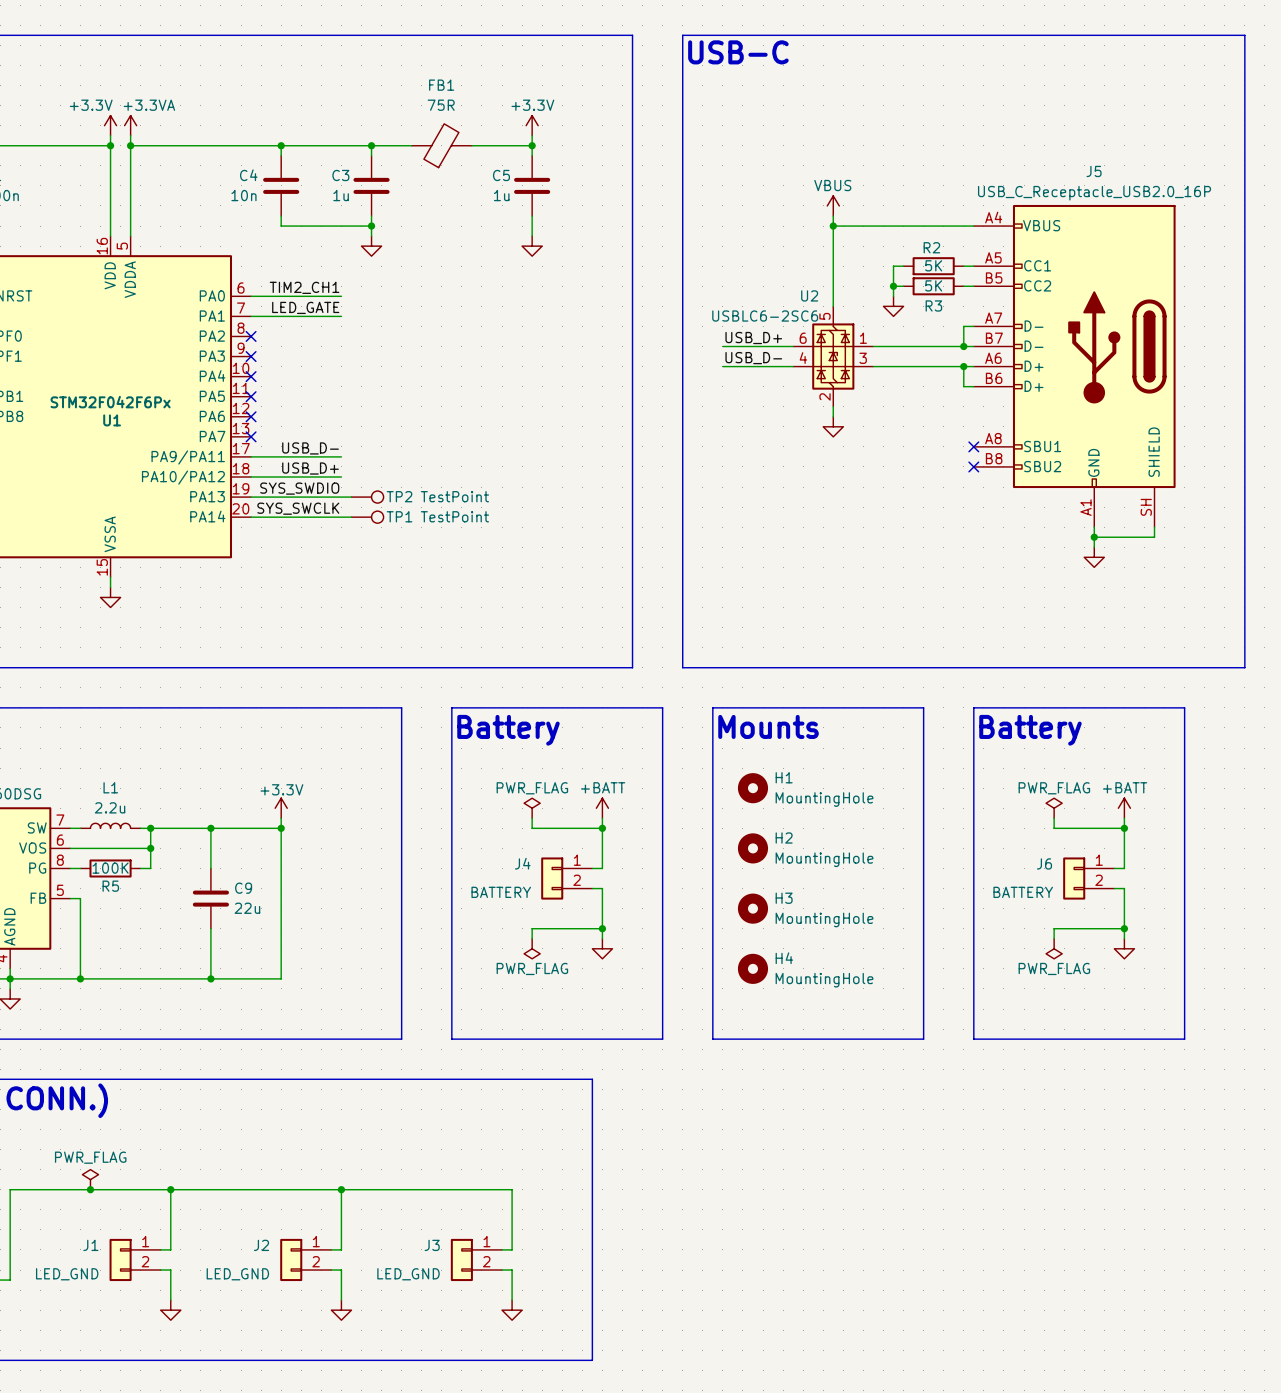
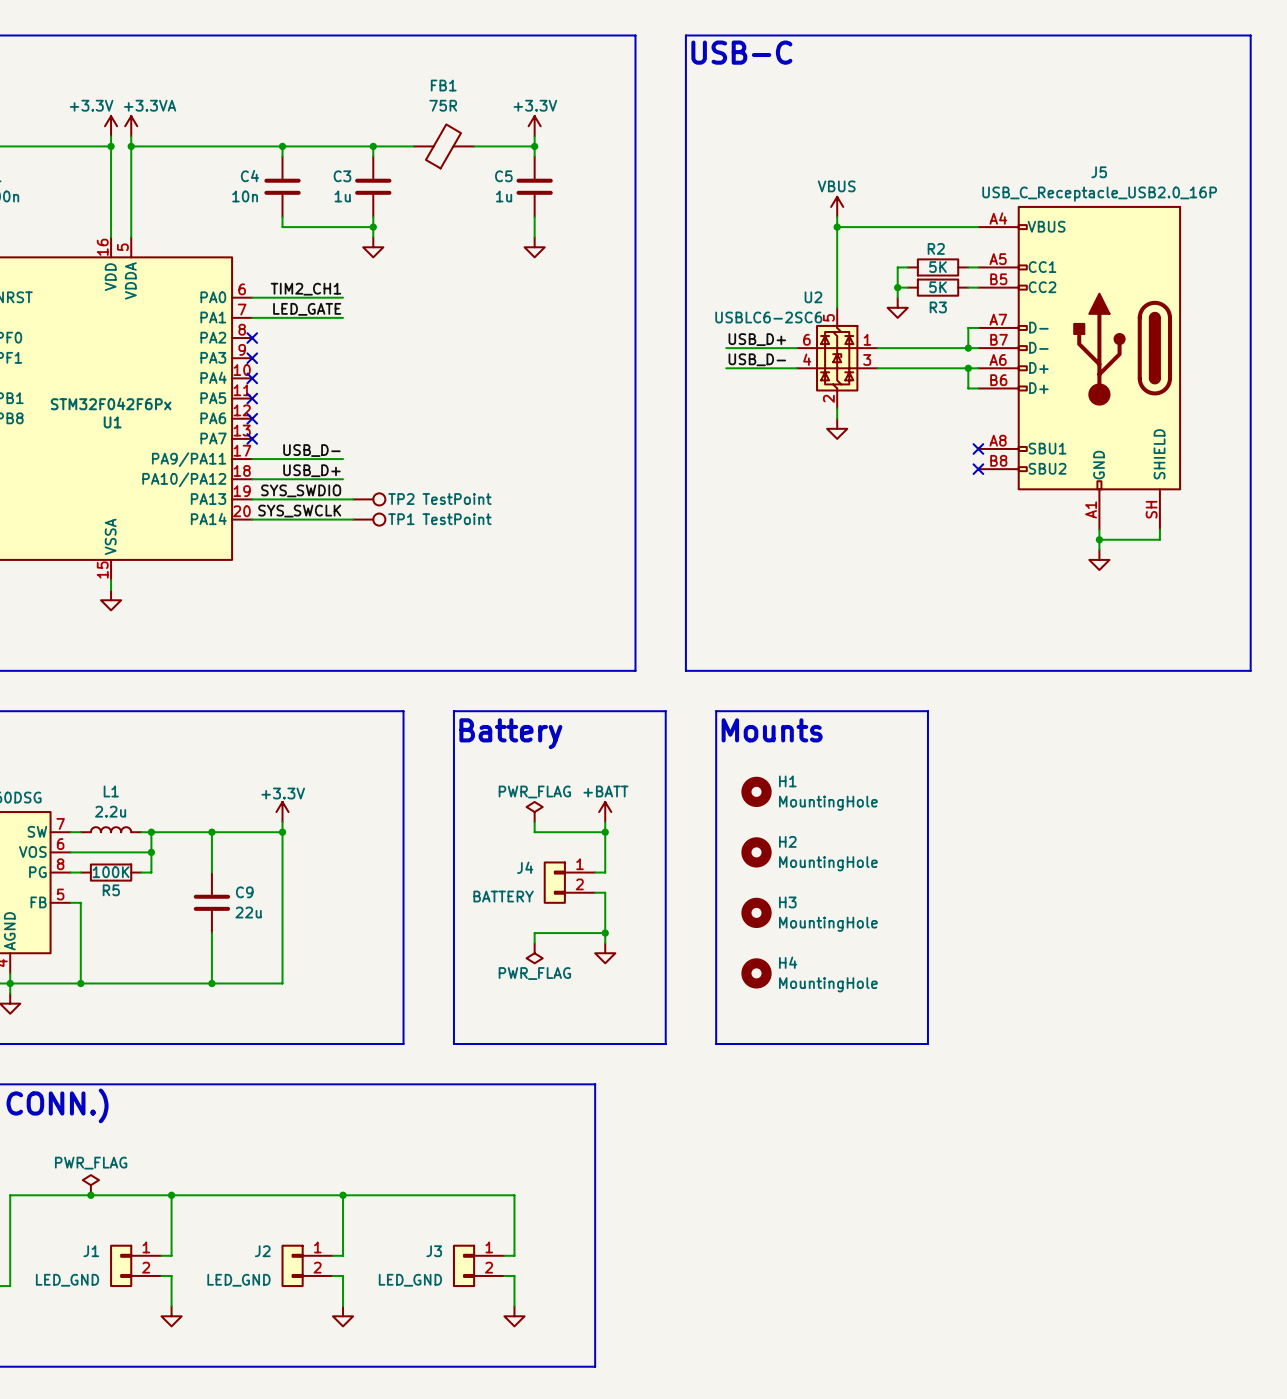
line: (973, 707) (1184, 707) (1184, 1039) (973, 1039) (973, 707) -> none
text: Battery (1030, 730) -> none
power symbol: PWR_FLAG (1054, 808) -> none
power symbol: +BATT (1124, 808) -> none
wire: (1054, 818) (1054, 828) (1124, 828) -> none
wire: (1124, 818) (1124, 868) (1114, 868) -> none
junction: (1124, 828) -> none
J6: BATTERY (1088, 878) -> none
wire: (1114, 888) (1124, 888) (1124, 938) -> none
wire: (1124, 928) (1054, 928) (1054, 938) -> none
junction: (1124, 928) -> none
power symbol: PWR_FLAG (1054, 948) -> none
power symbol: (1124, 948) -> none

